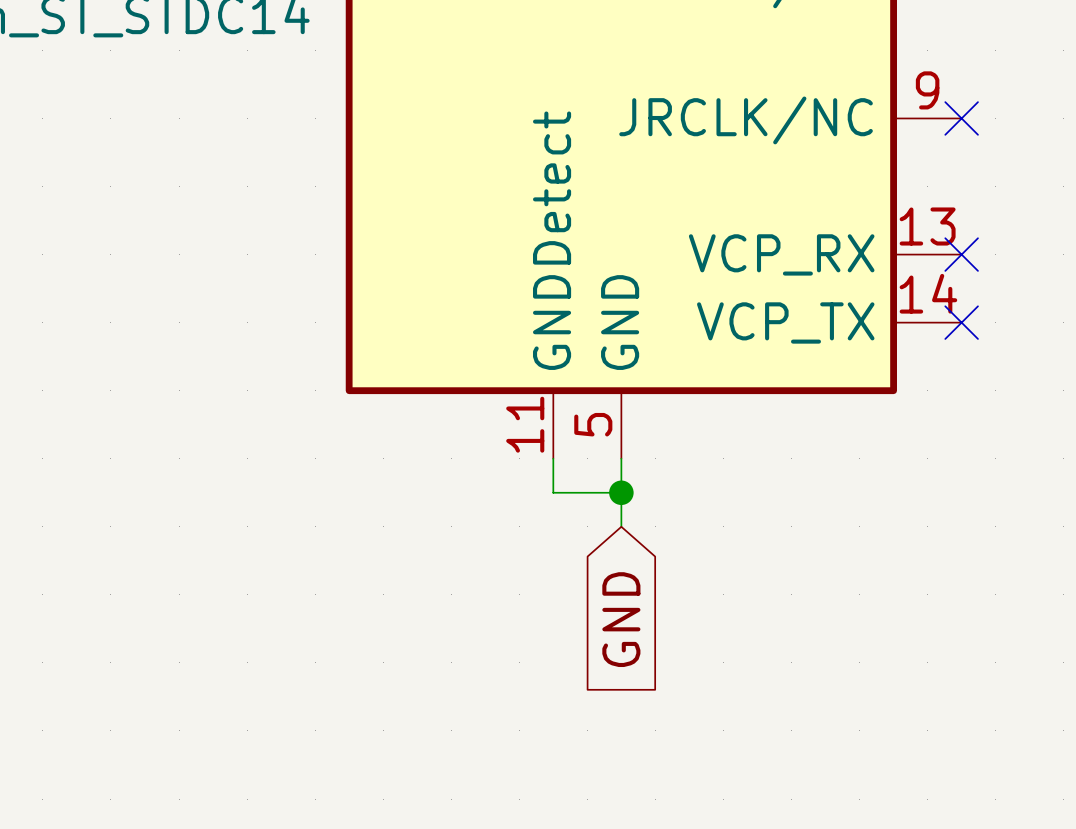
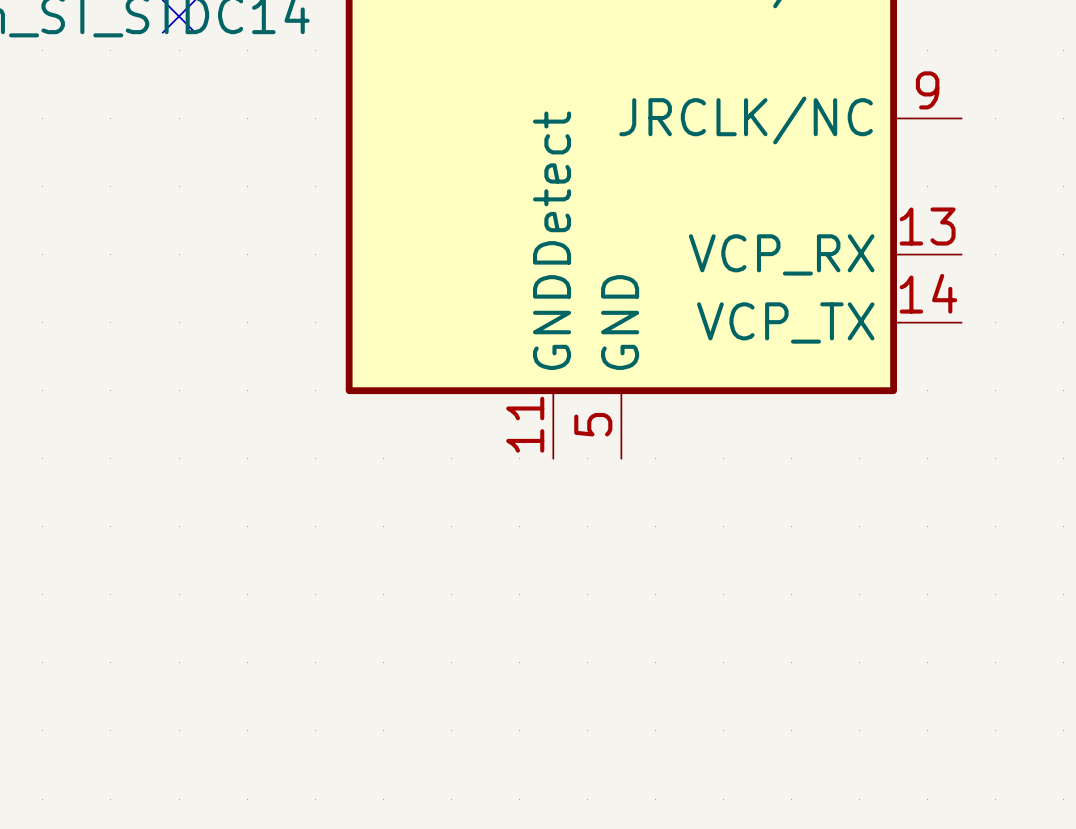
no-connect mark: none -> (179, 16)
no-connect mark: (961, 118) -> none
no-connect mark: (961, 254) -> none
no-connect mark: (961, 322) -> none
wire: (553, 458) (553, 492) (621, 492) -> none
wire: (621, 458) (621, 526) -> none
junction: (621, 492) -> none
global label: GND (621, 619) -> none

